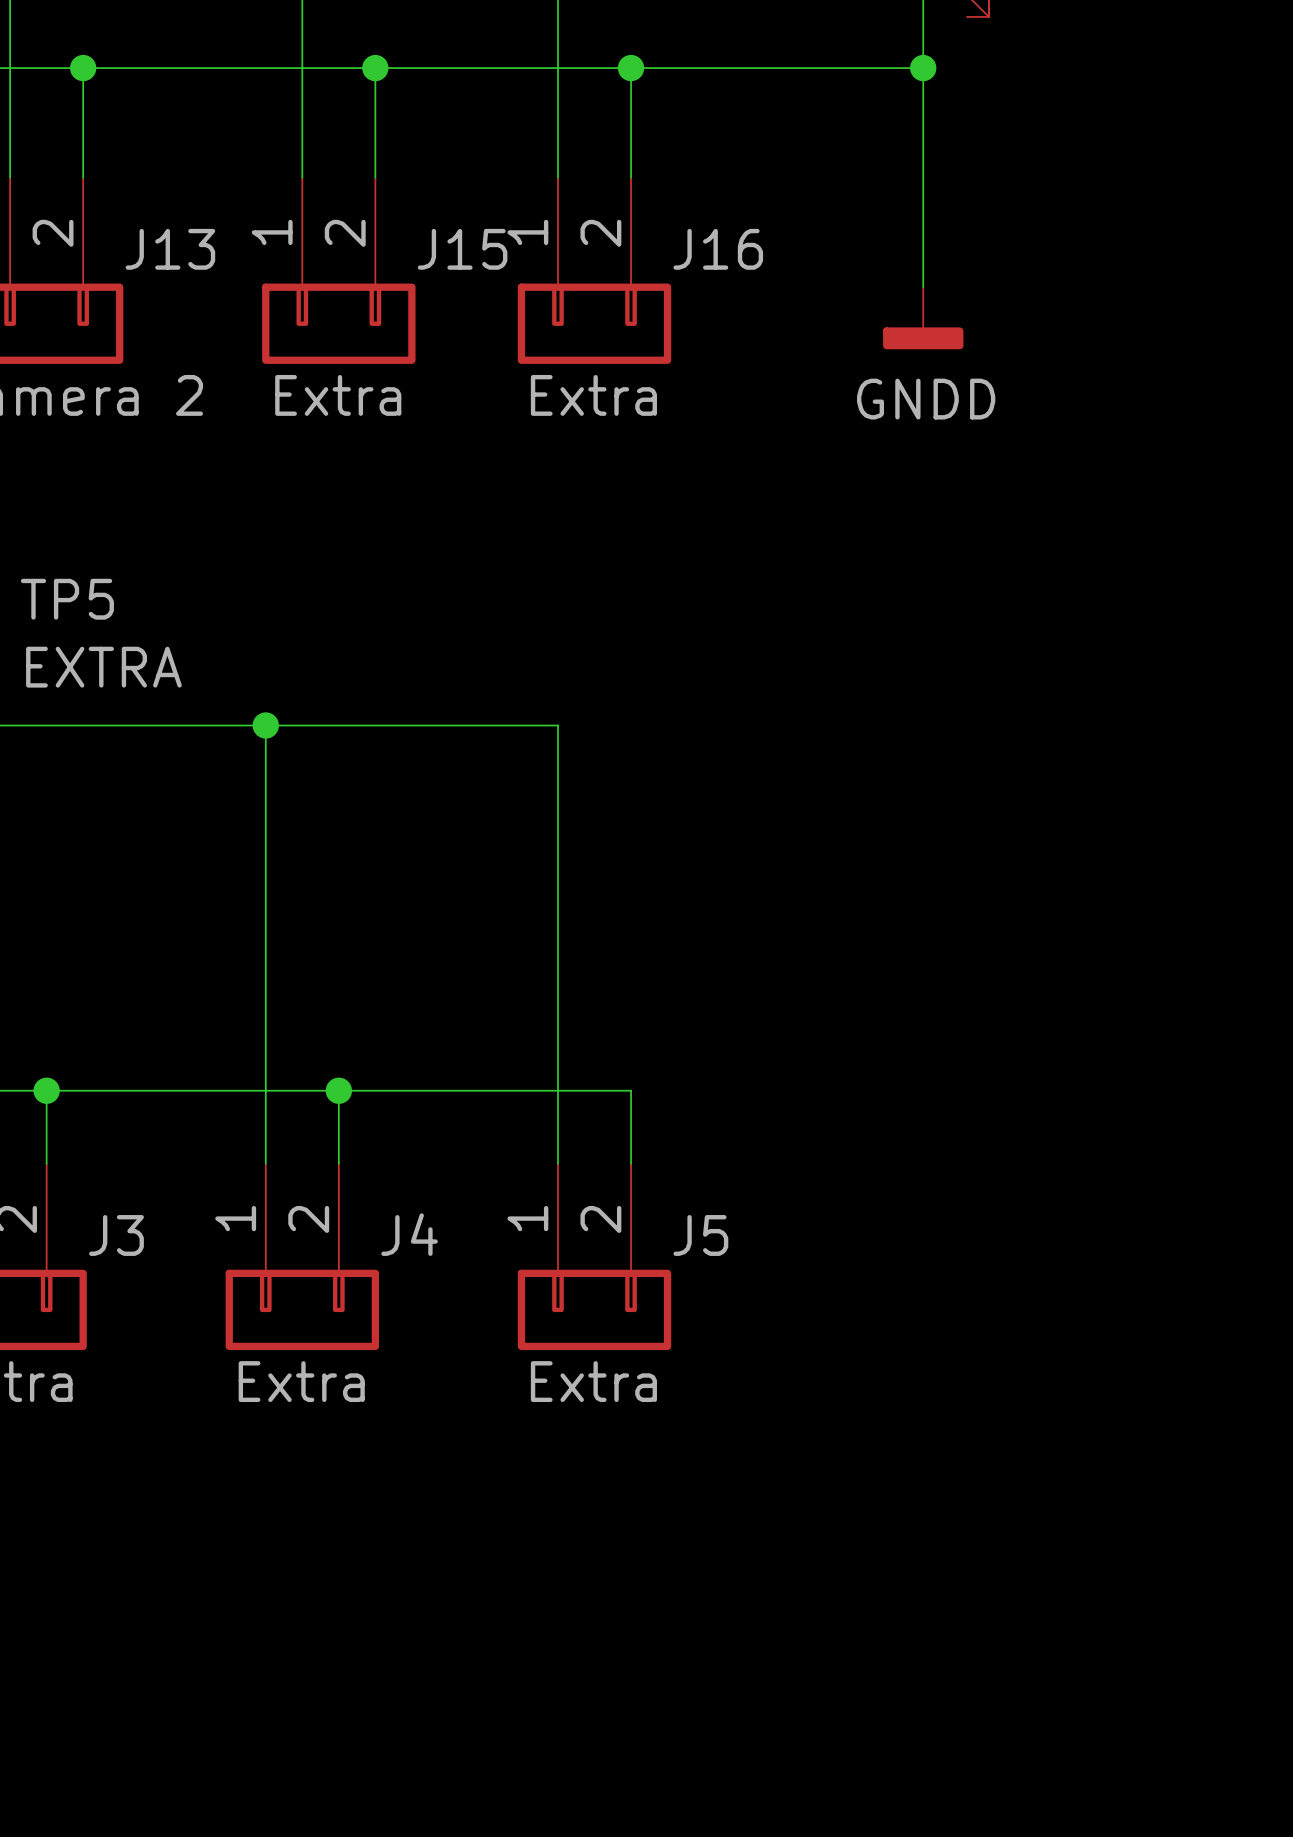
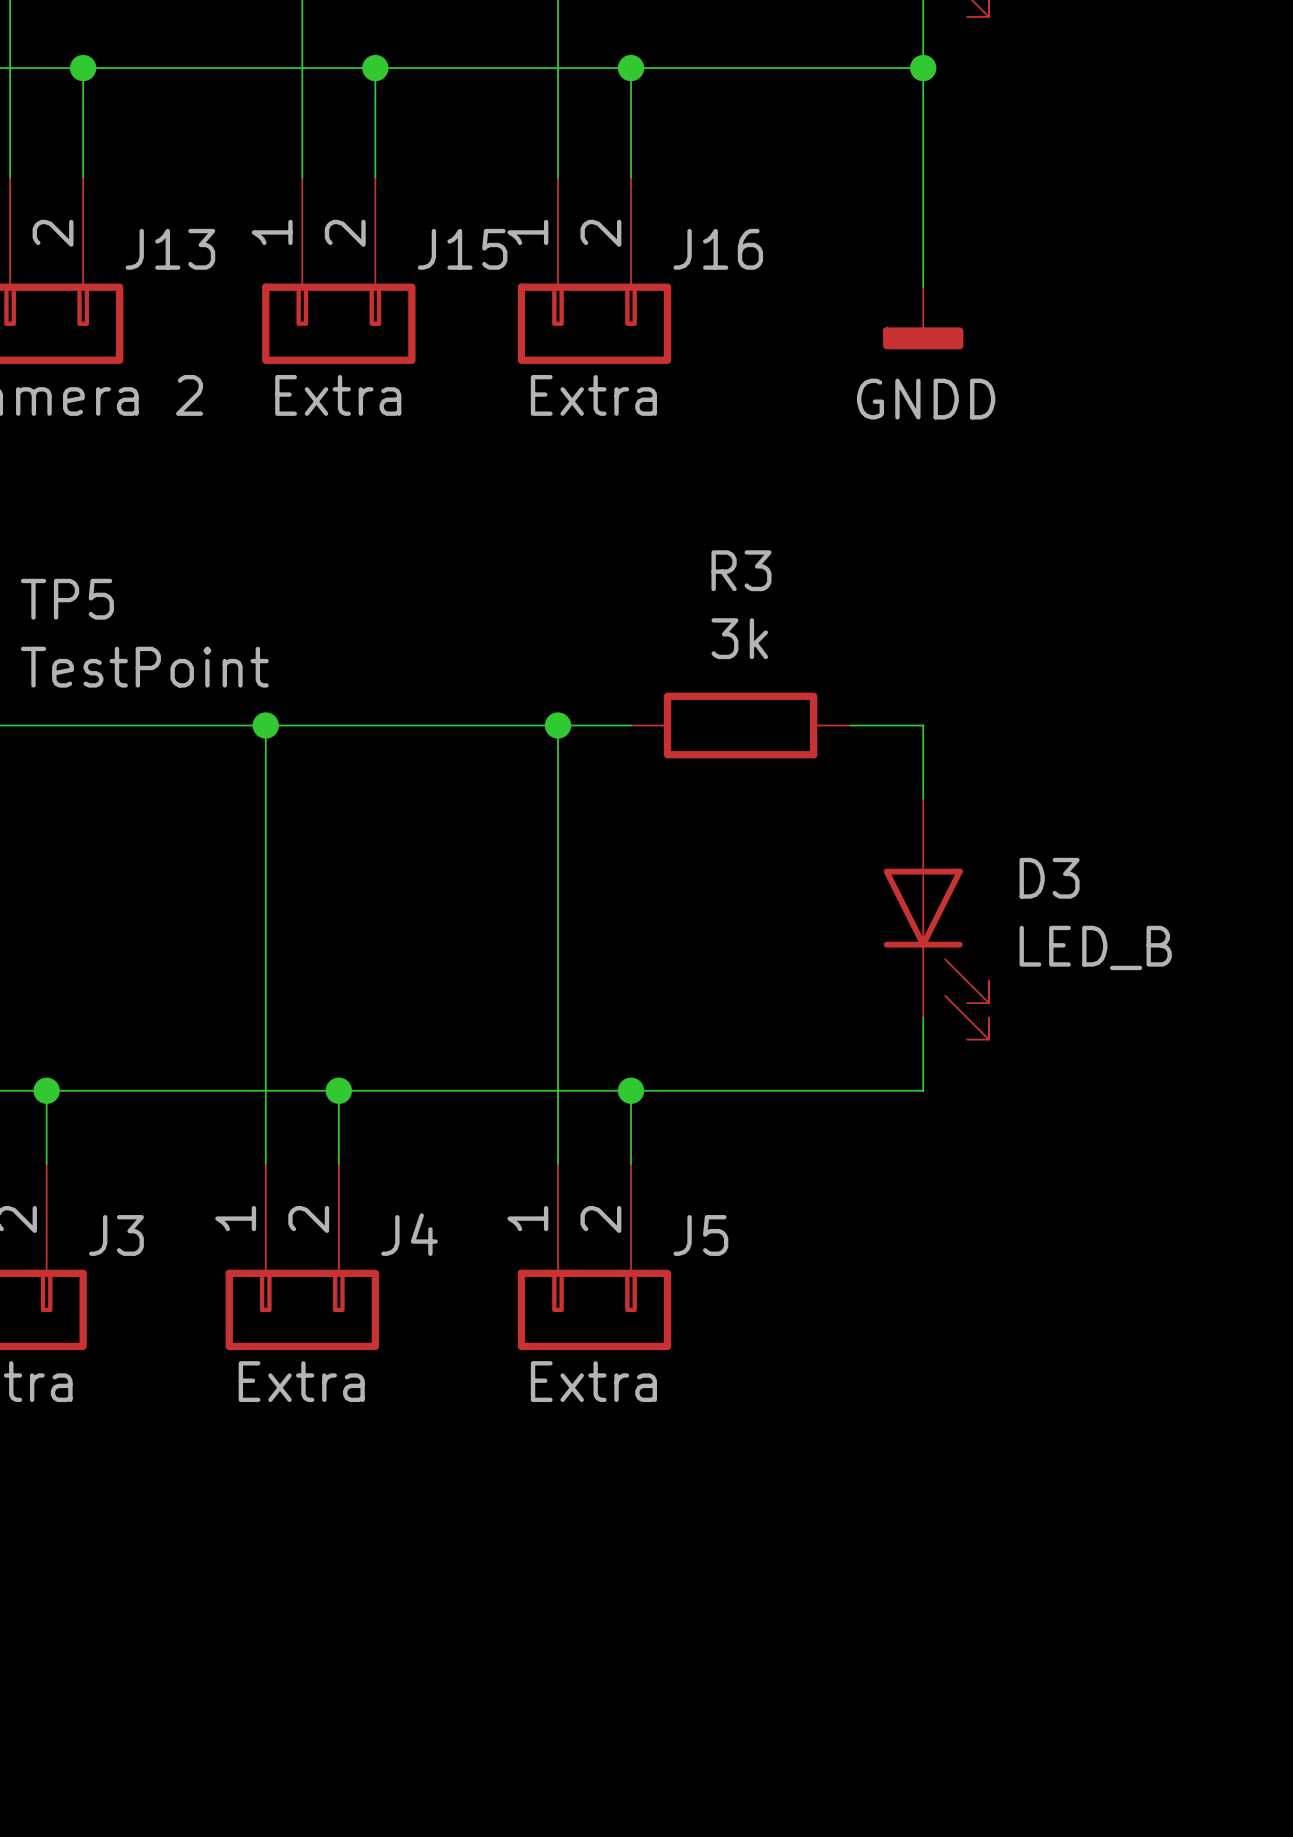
TP5 value: EXTRA (103, 667) -> TestPoint (144, 667)
wire: none -> (557, 725) (631, 725)
junction: none -> (557, 725)
R3: none -> 3k (740, 725)
wire: none -> (850, 725) (923, 725) (923, 798)
D3: none -> LED_B (936, 919)
wire: none -> (923, 1017) (923, 1090) (631, 1090)
junction: none -> (631, 1090)

